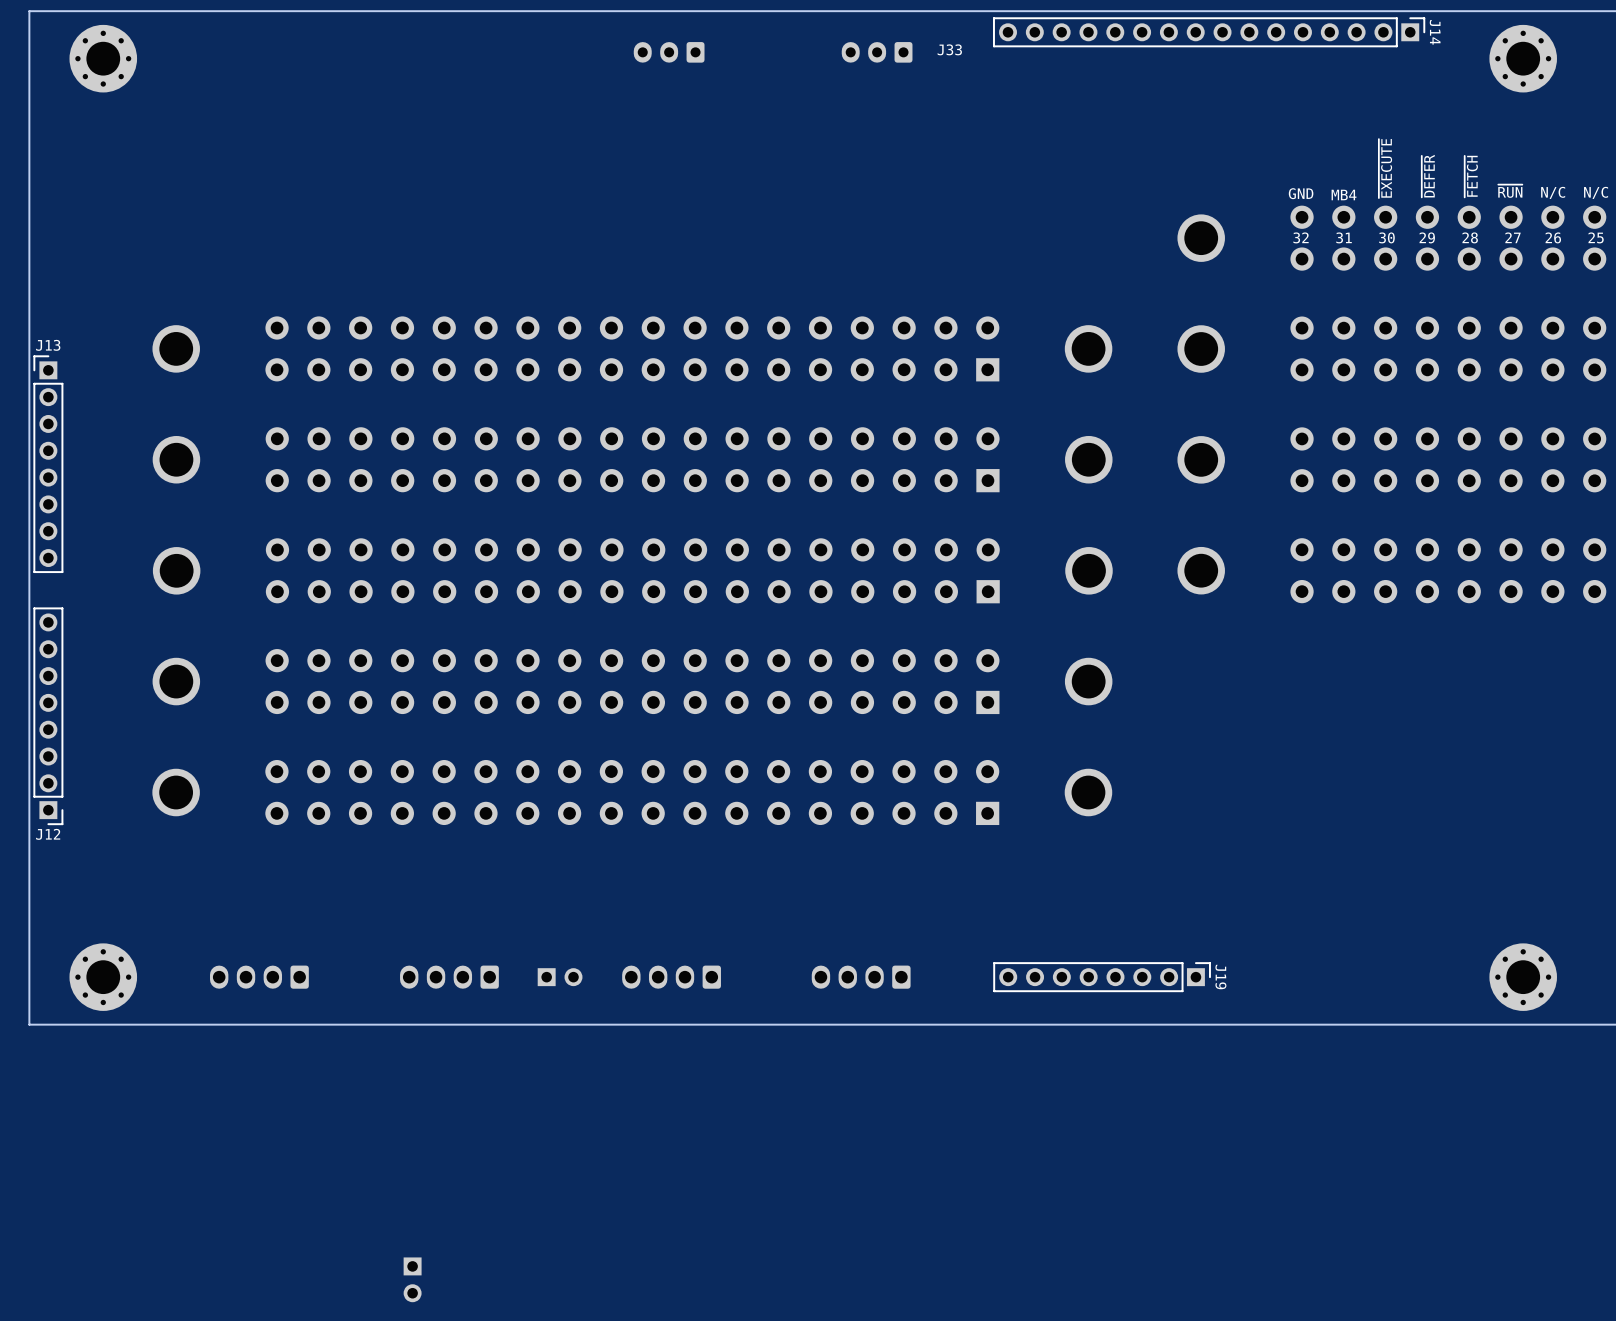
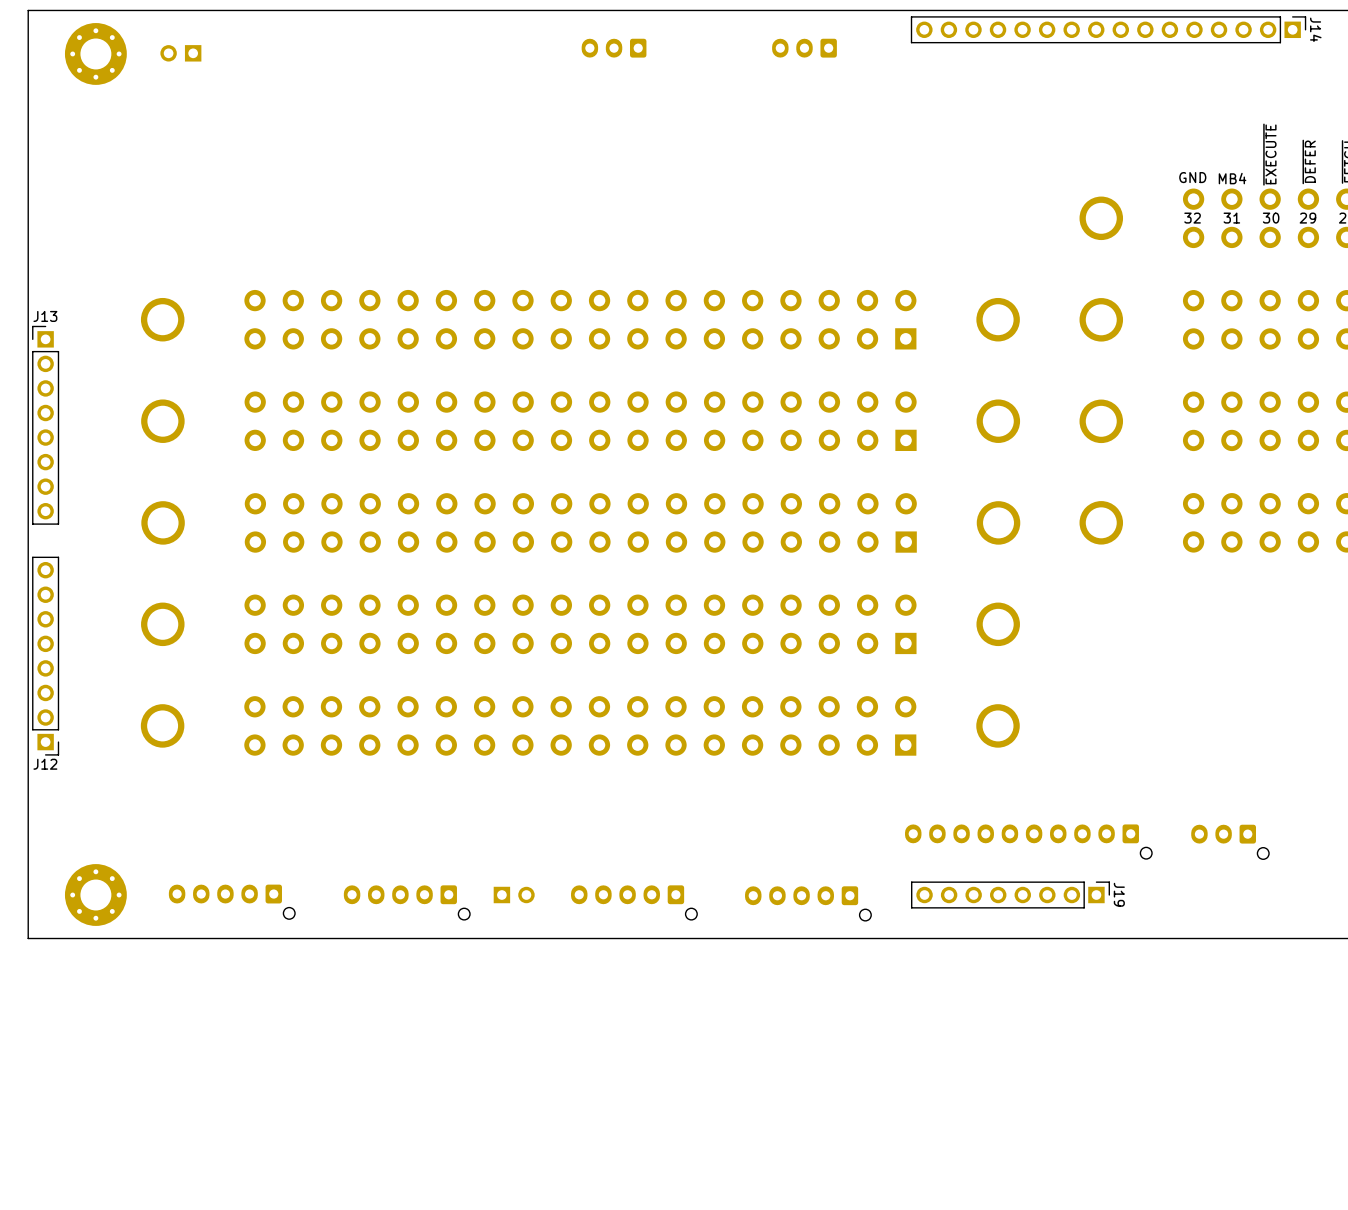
J33 name: J33 (949, 49) -> none
part: none -> (180, 53)
part: none -> (1028, 841)
part: none -> (1230, 842)
part footprint: [400, 965, 499, 989] -> [343, 885, 471, 920]
part: (259, 977) -> none
part: (671, 977) -> none
part: (861, 977) -> none
part: none -> (231, 901)
part: none -> (634, 902)
part: none -> (808, 903)
part: (412, 1279) -> none

